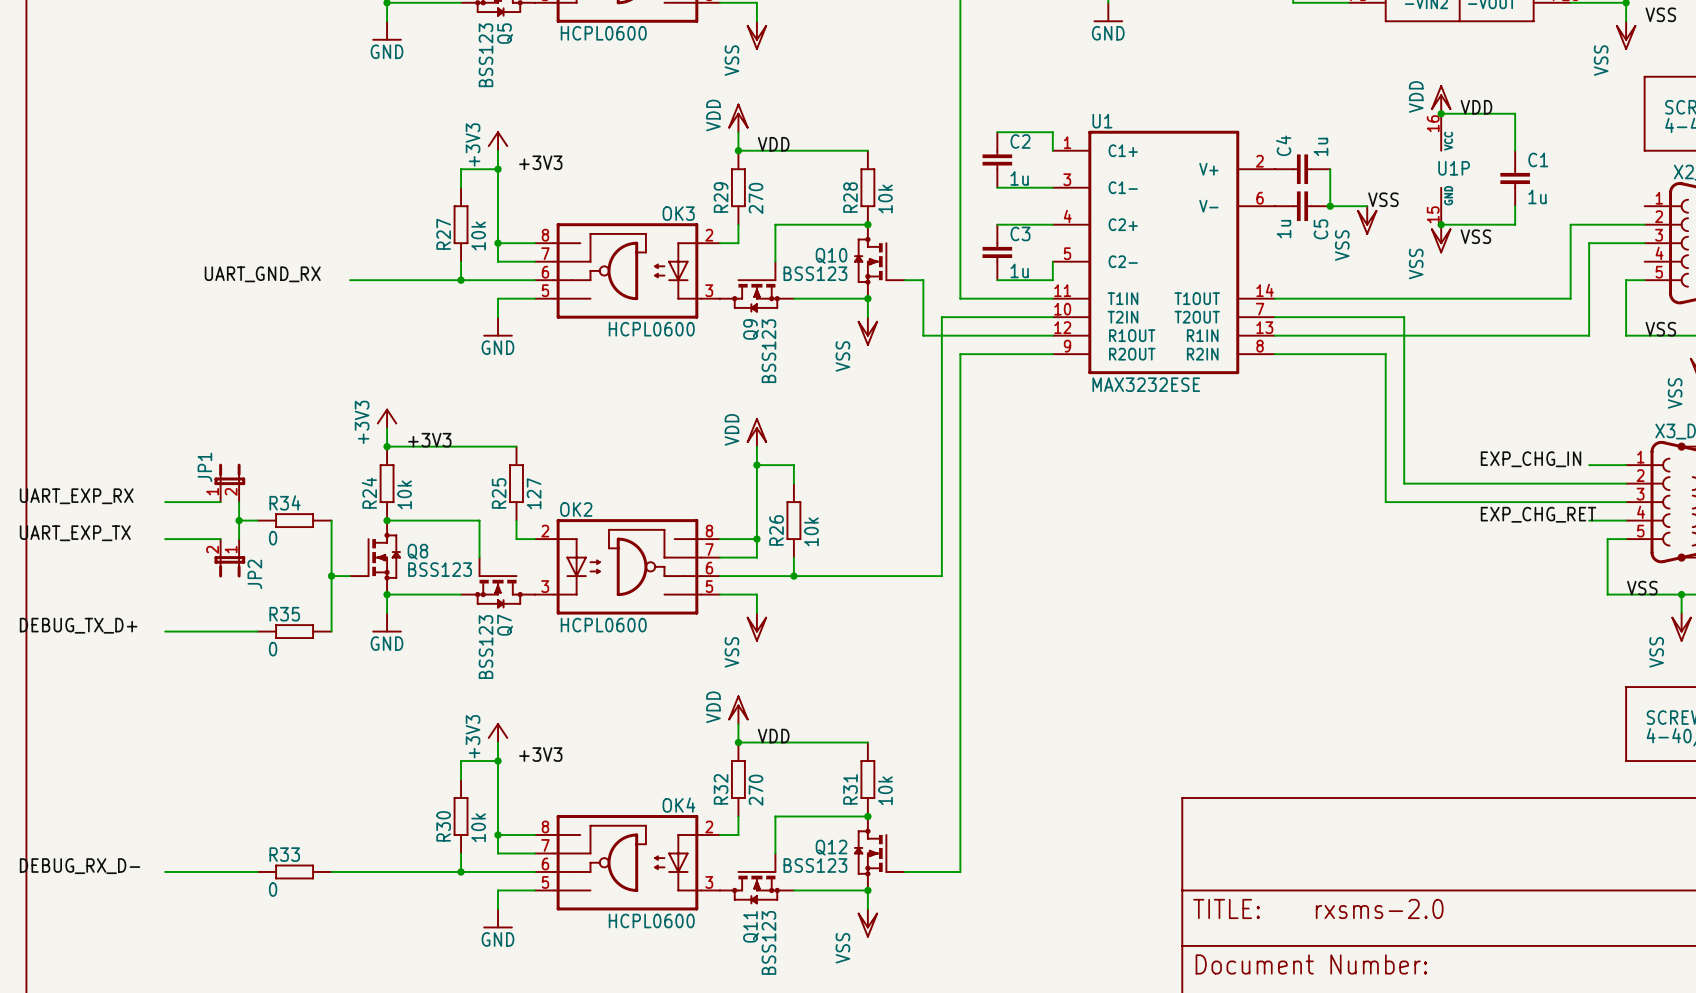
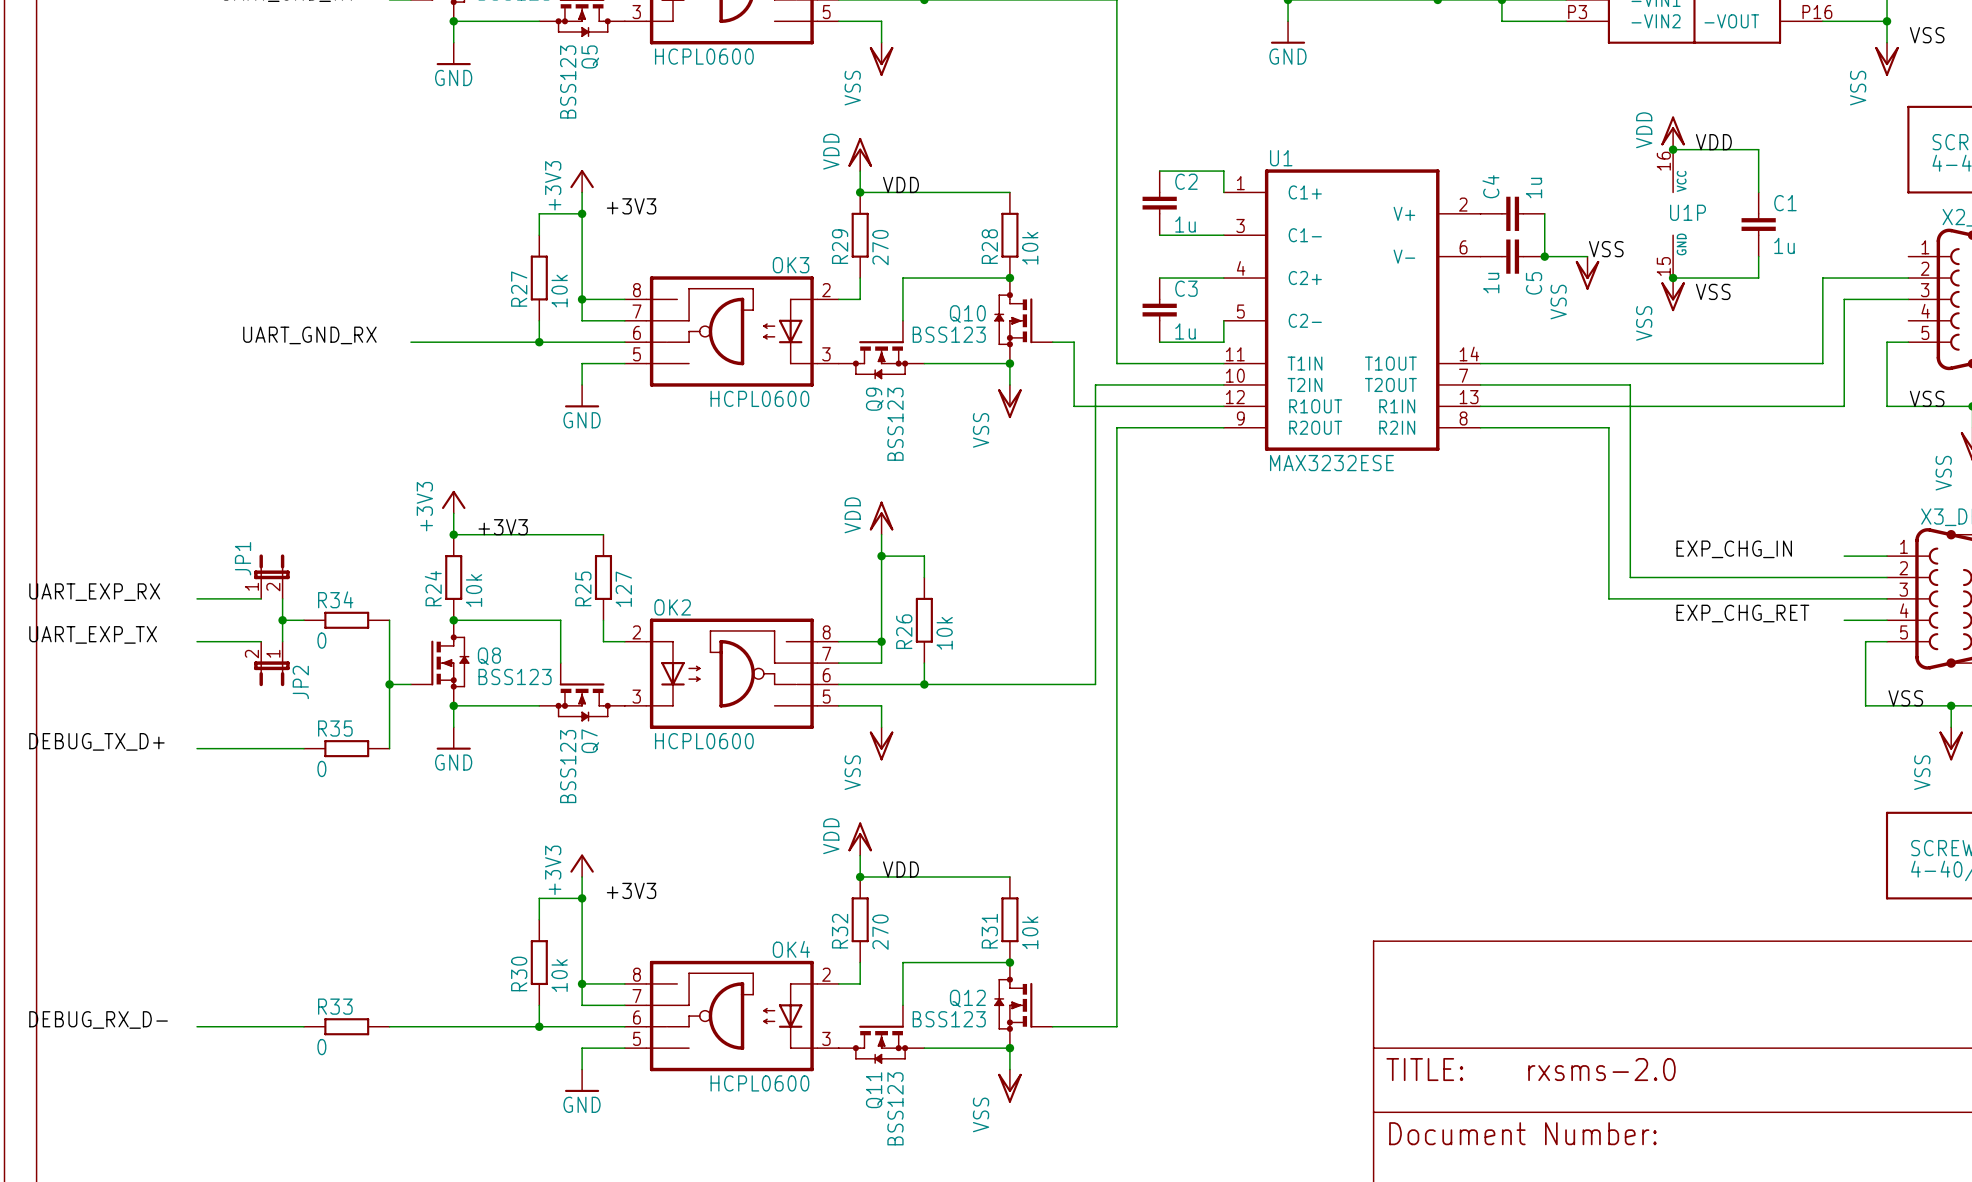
label position: EXP_CHG_IN (1531, 459) -> EXP_CHG_IN (1734, 549)
label position: EXP_CHG_RET (1538, 514) -> EXP_CHG_RET (1742, 613)

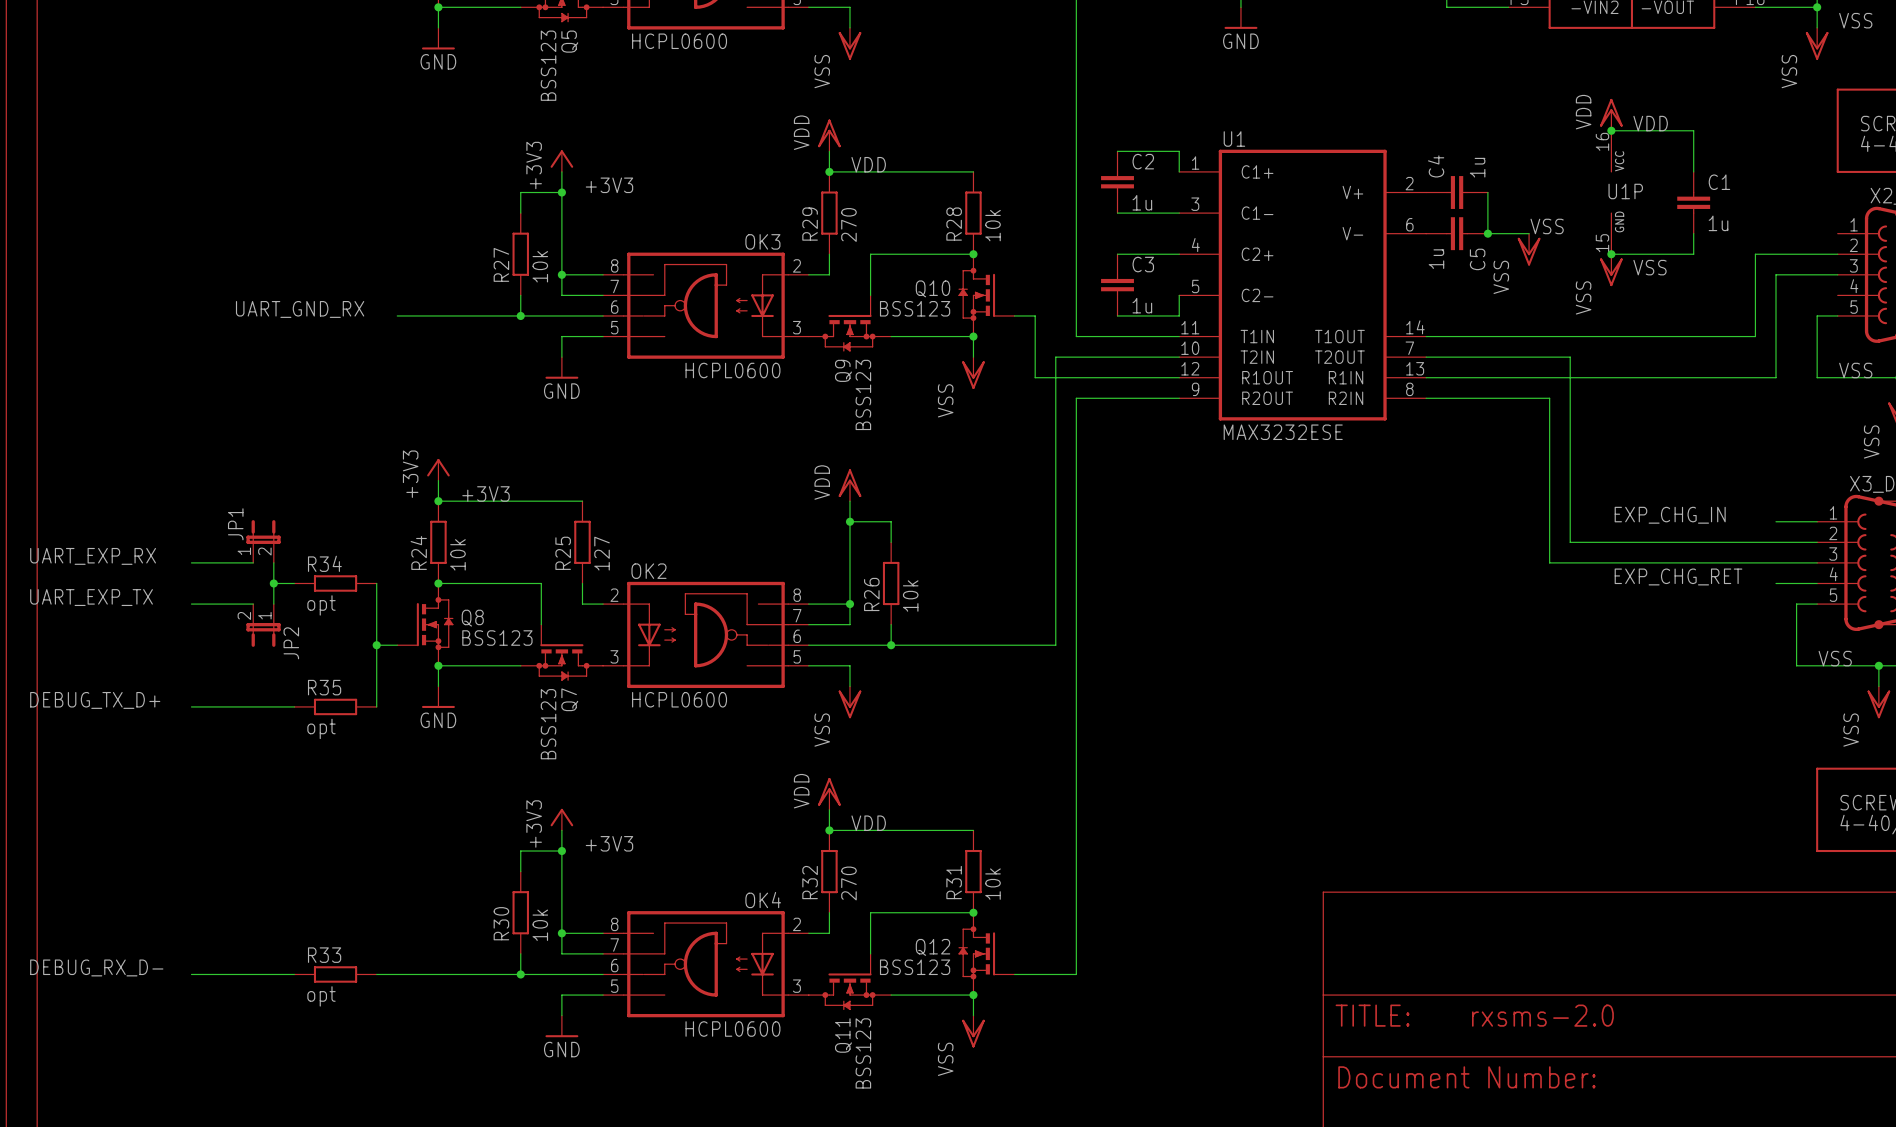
R34 value: 0 (321, 640) -> opt (321, 605)
R35 value: 0 (321, 768) -> opt (321, 728)
R33 value: 0 (321, 1047) -> opt (321, 996)

